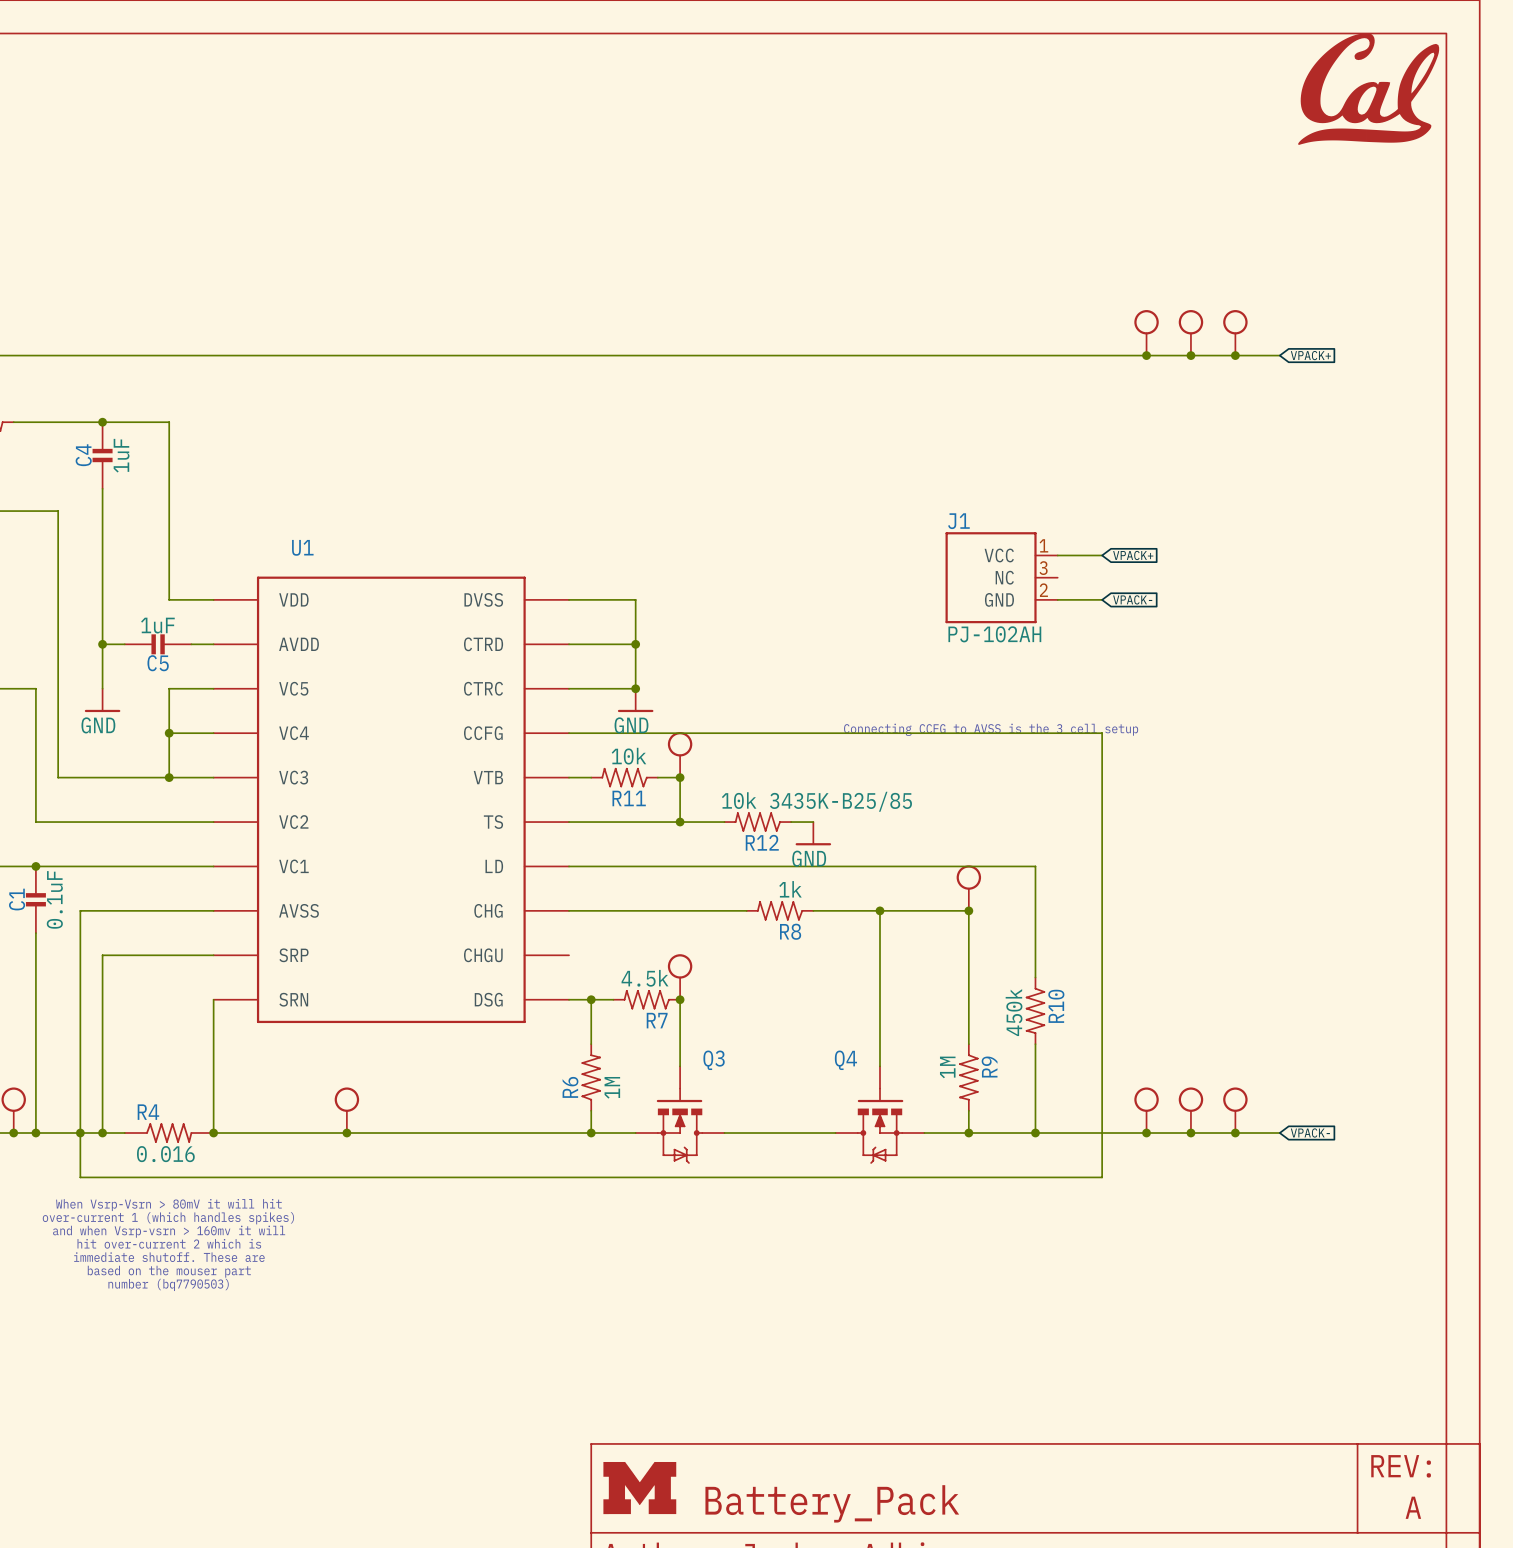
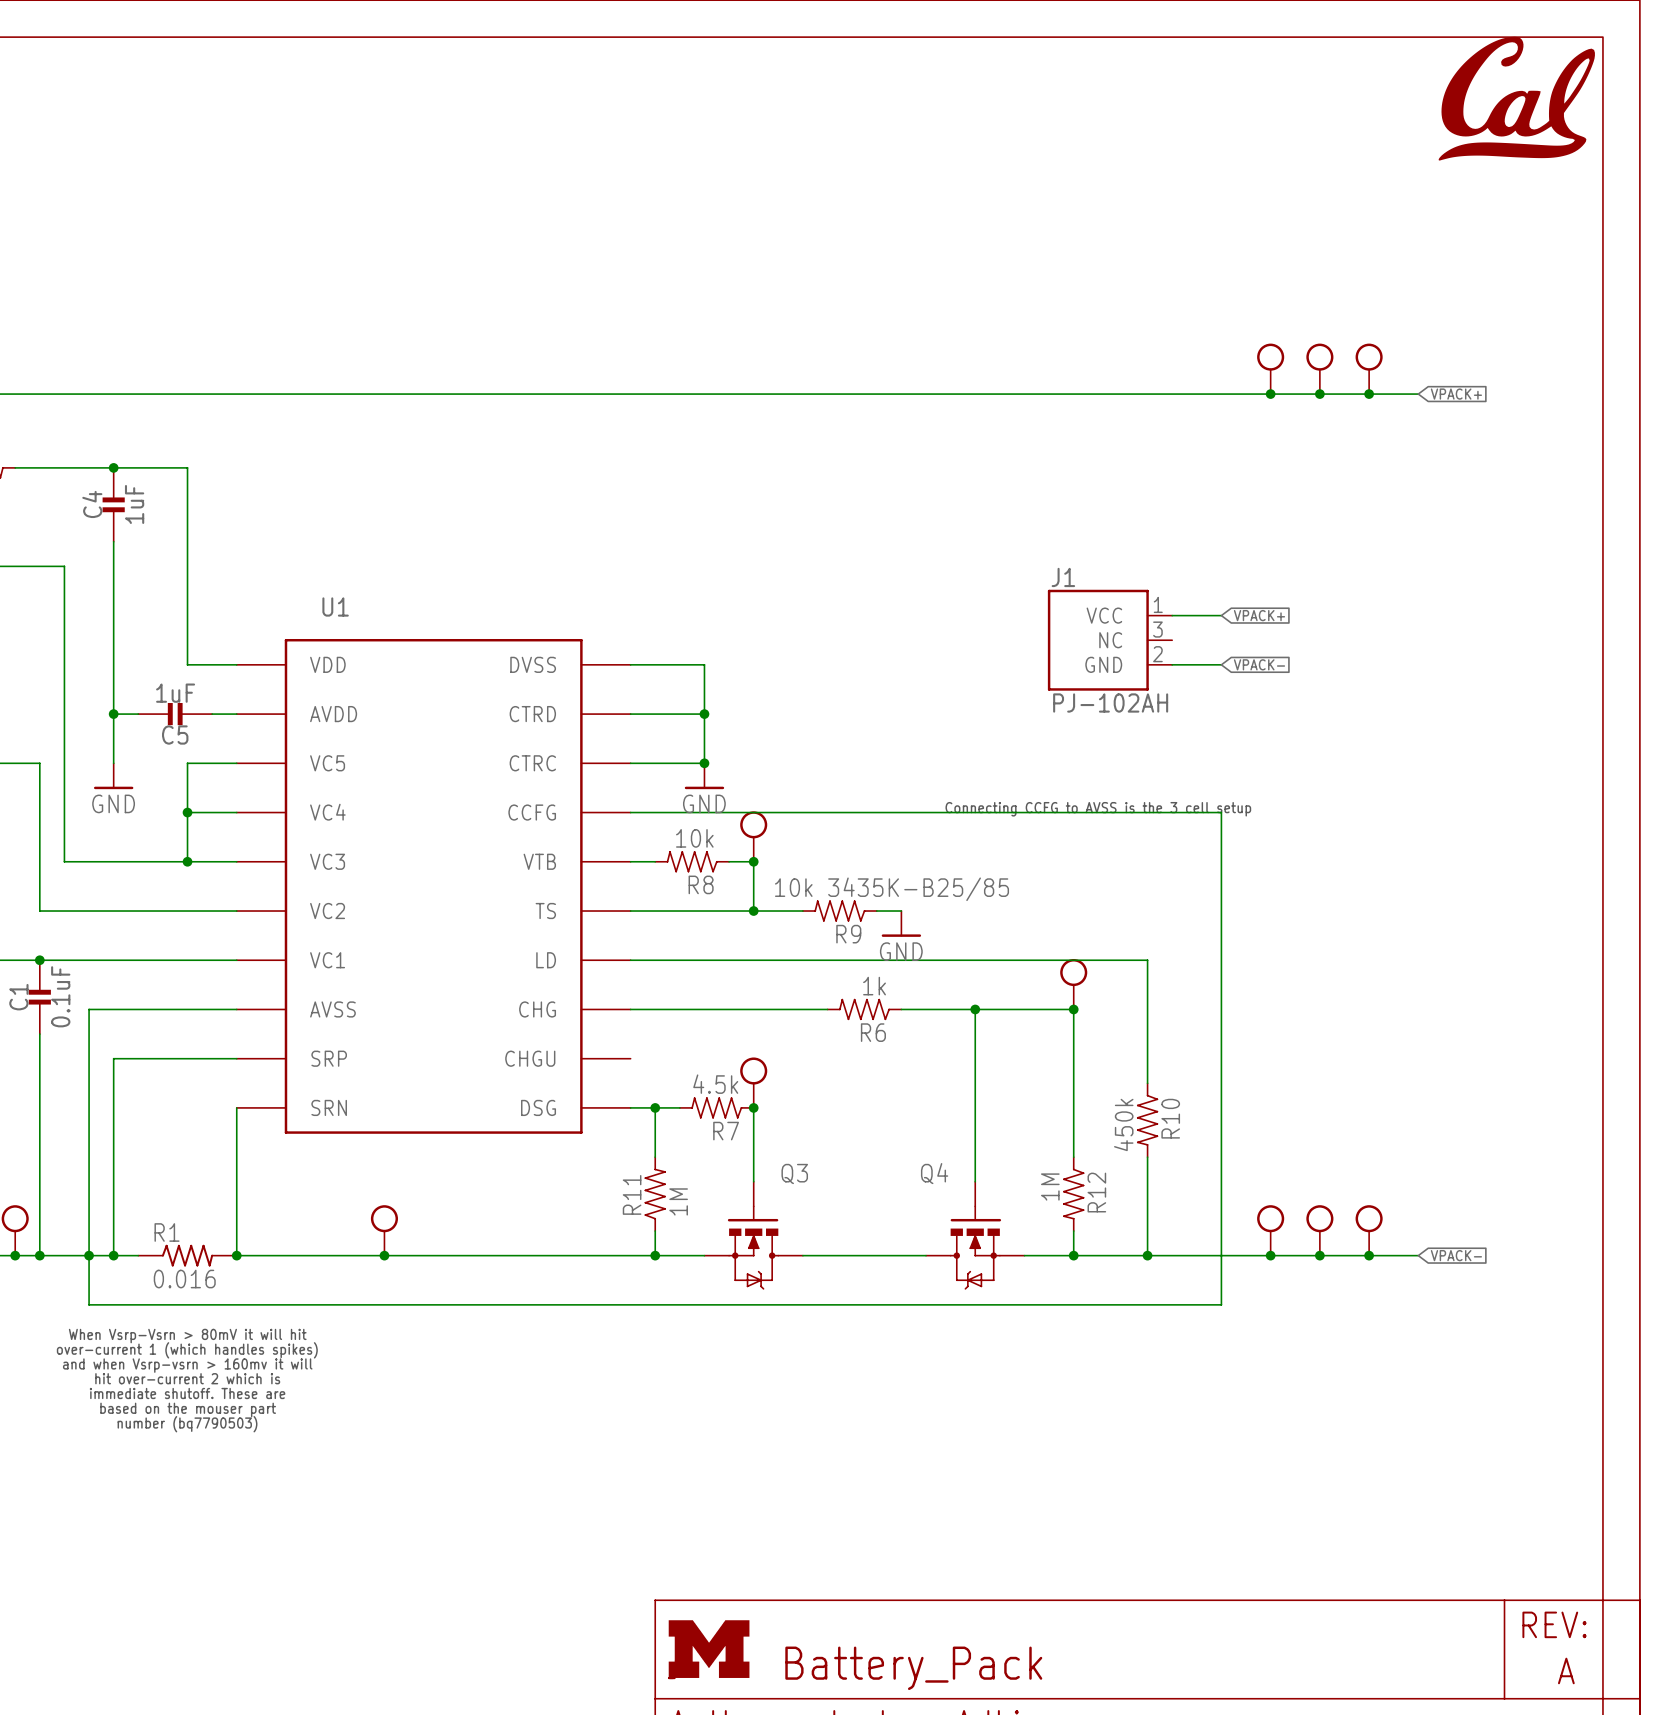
R11 name: R11 (629, 798) -> R8 (701, 884)
R12 name: R12 (762, 842) -> R9 (848, 934)
R8 name: R8 (790, 931) -> R6 (873, 1032)
R9 name: R9 (989, 1067) -> R12 (1096, 1192)
R6 name: R6 (570, 1087) -> R11 (632, 1194)
R4 name: R4 (148, 1112) -> R1 (167, 1232)

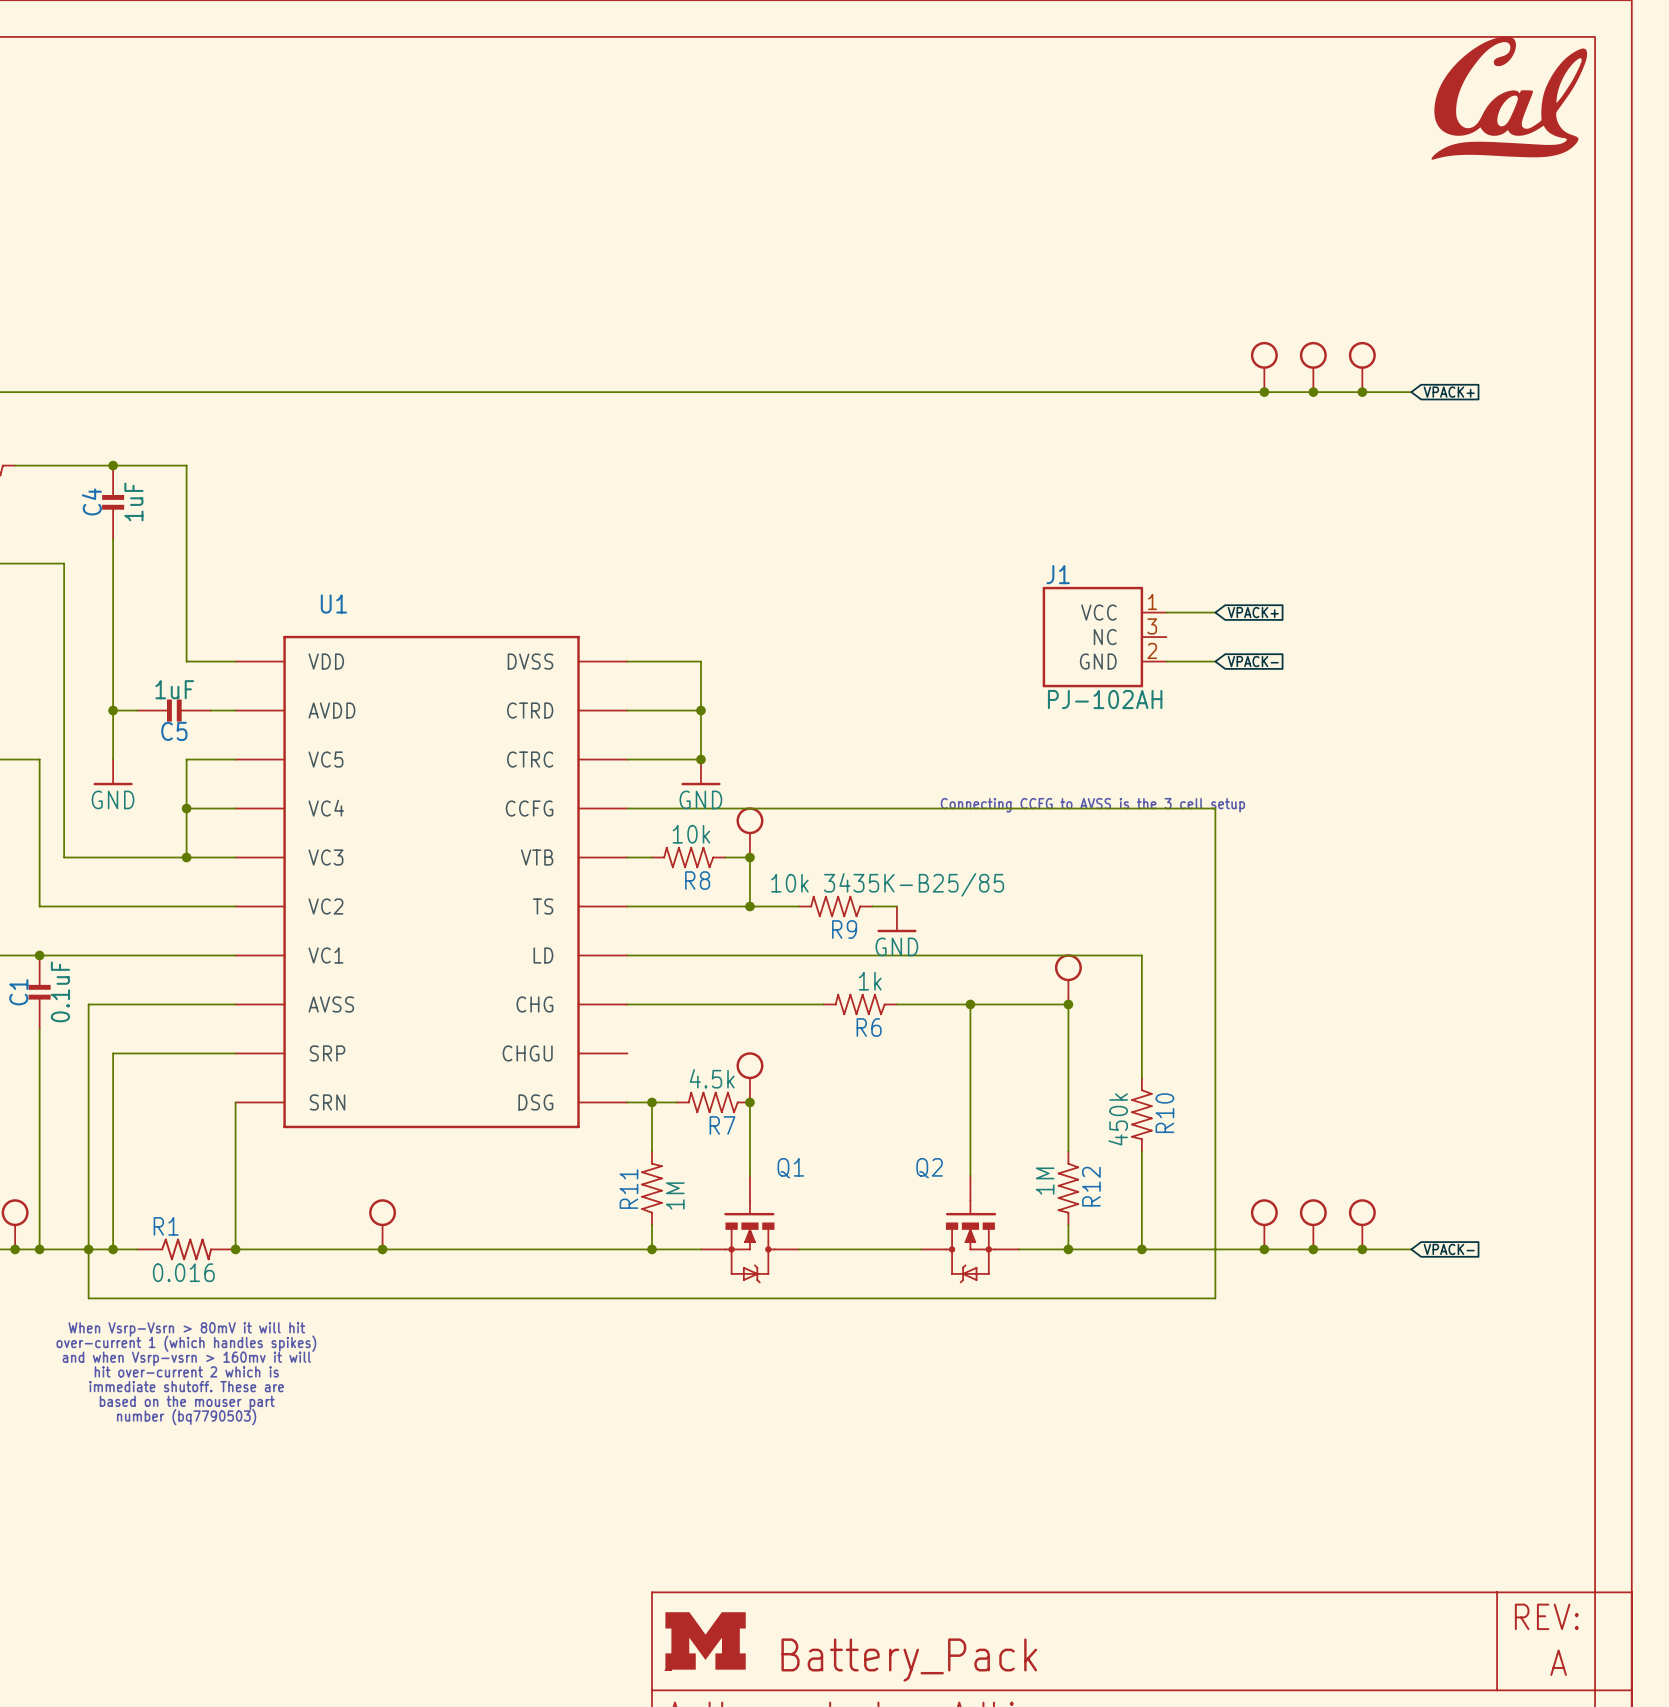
Q3 name: Q3 (794, 1173) -> Q1 (790, 1168)
Q4 name: Q4 (934, 1173) -> Q2 (929, 1168)

